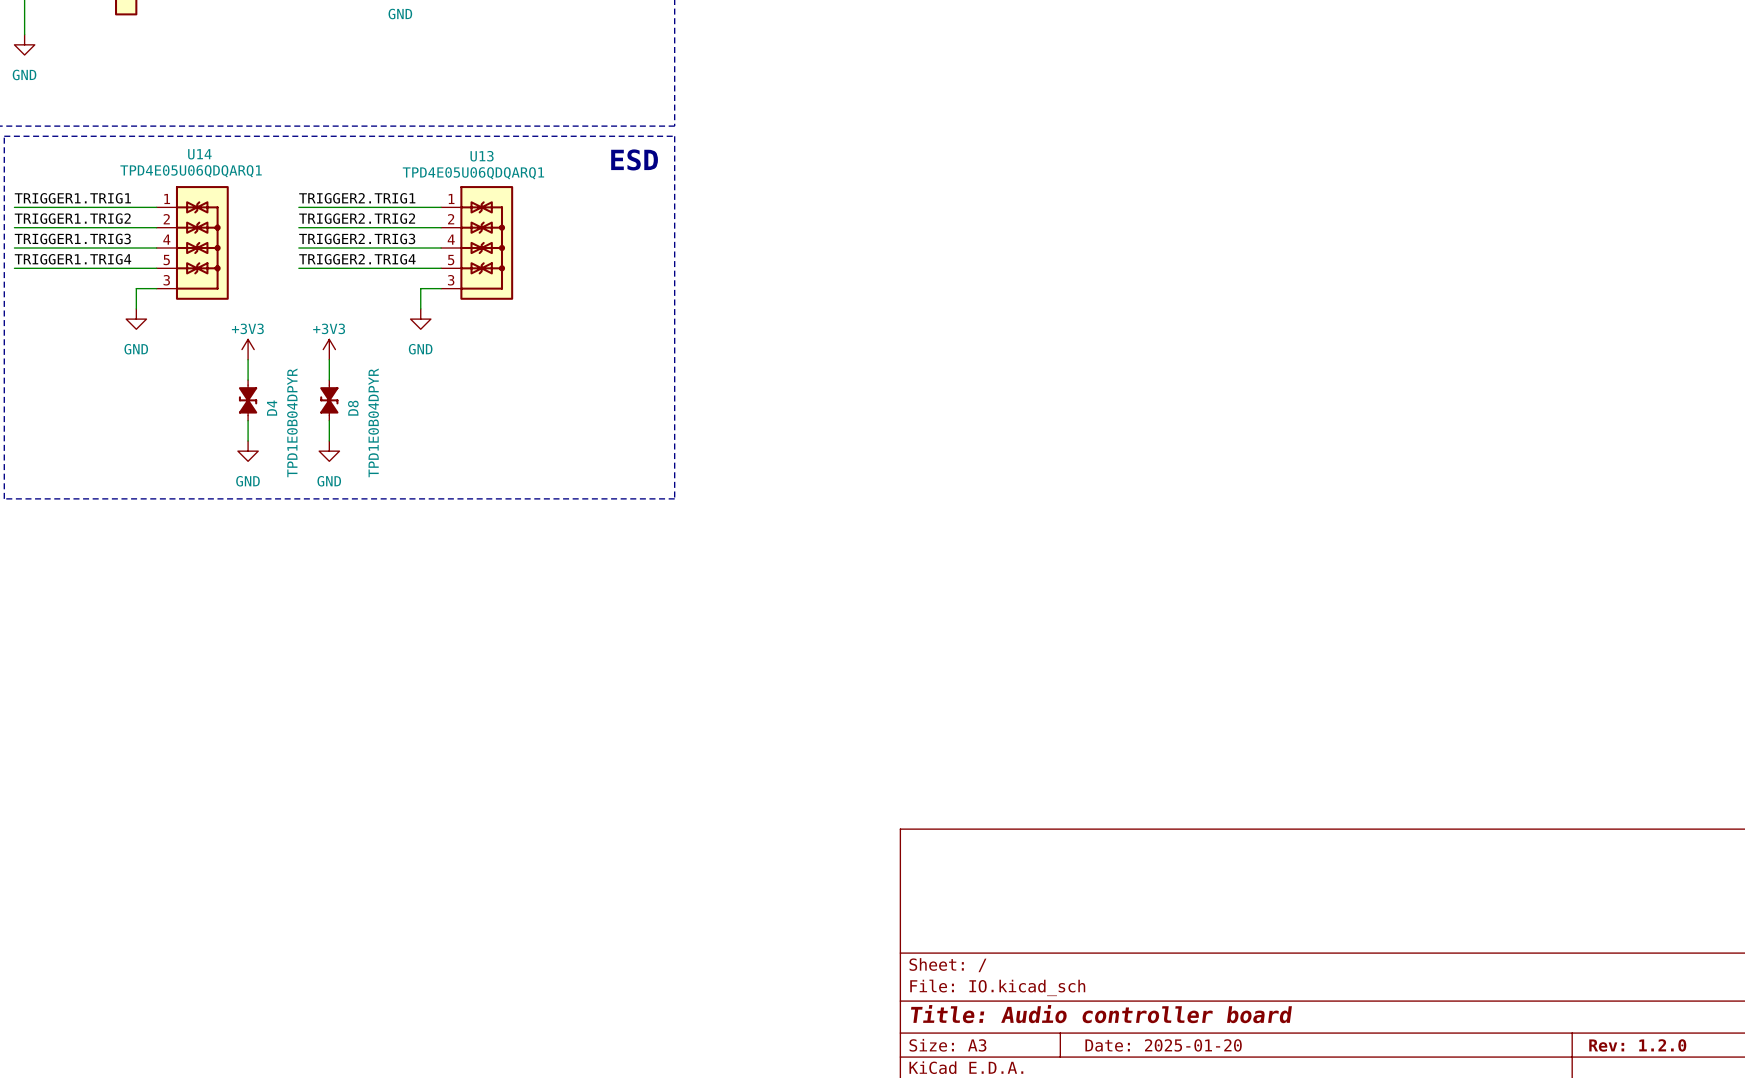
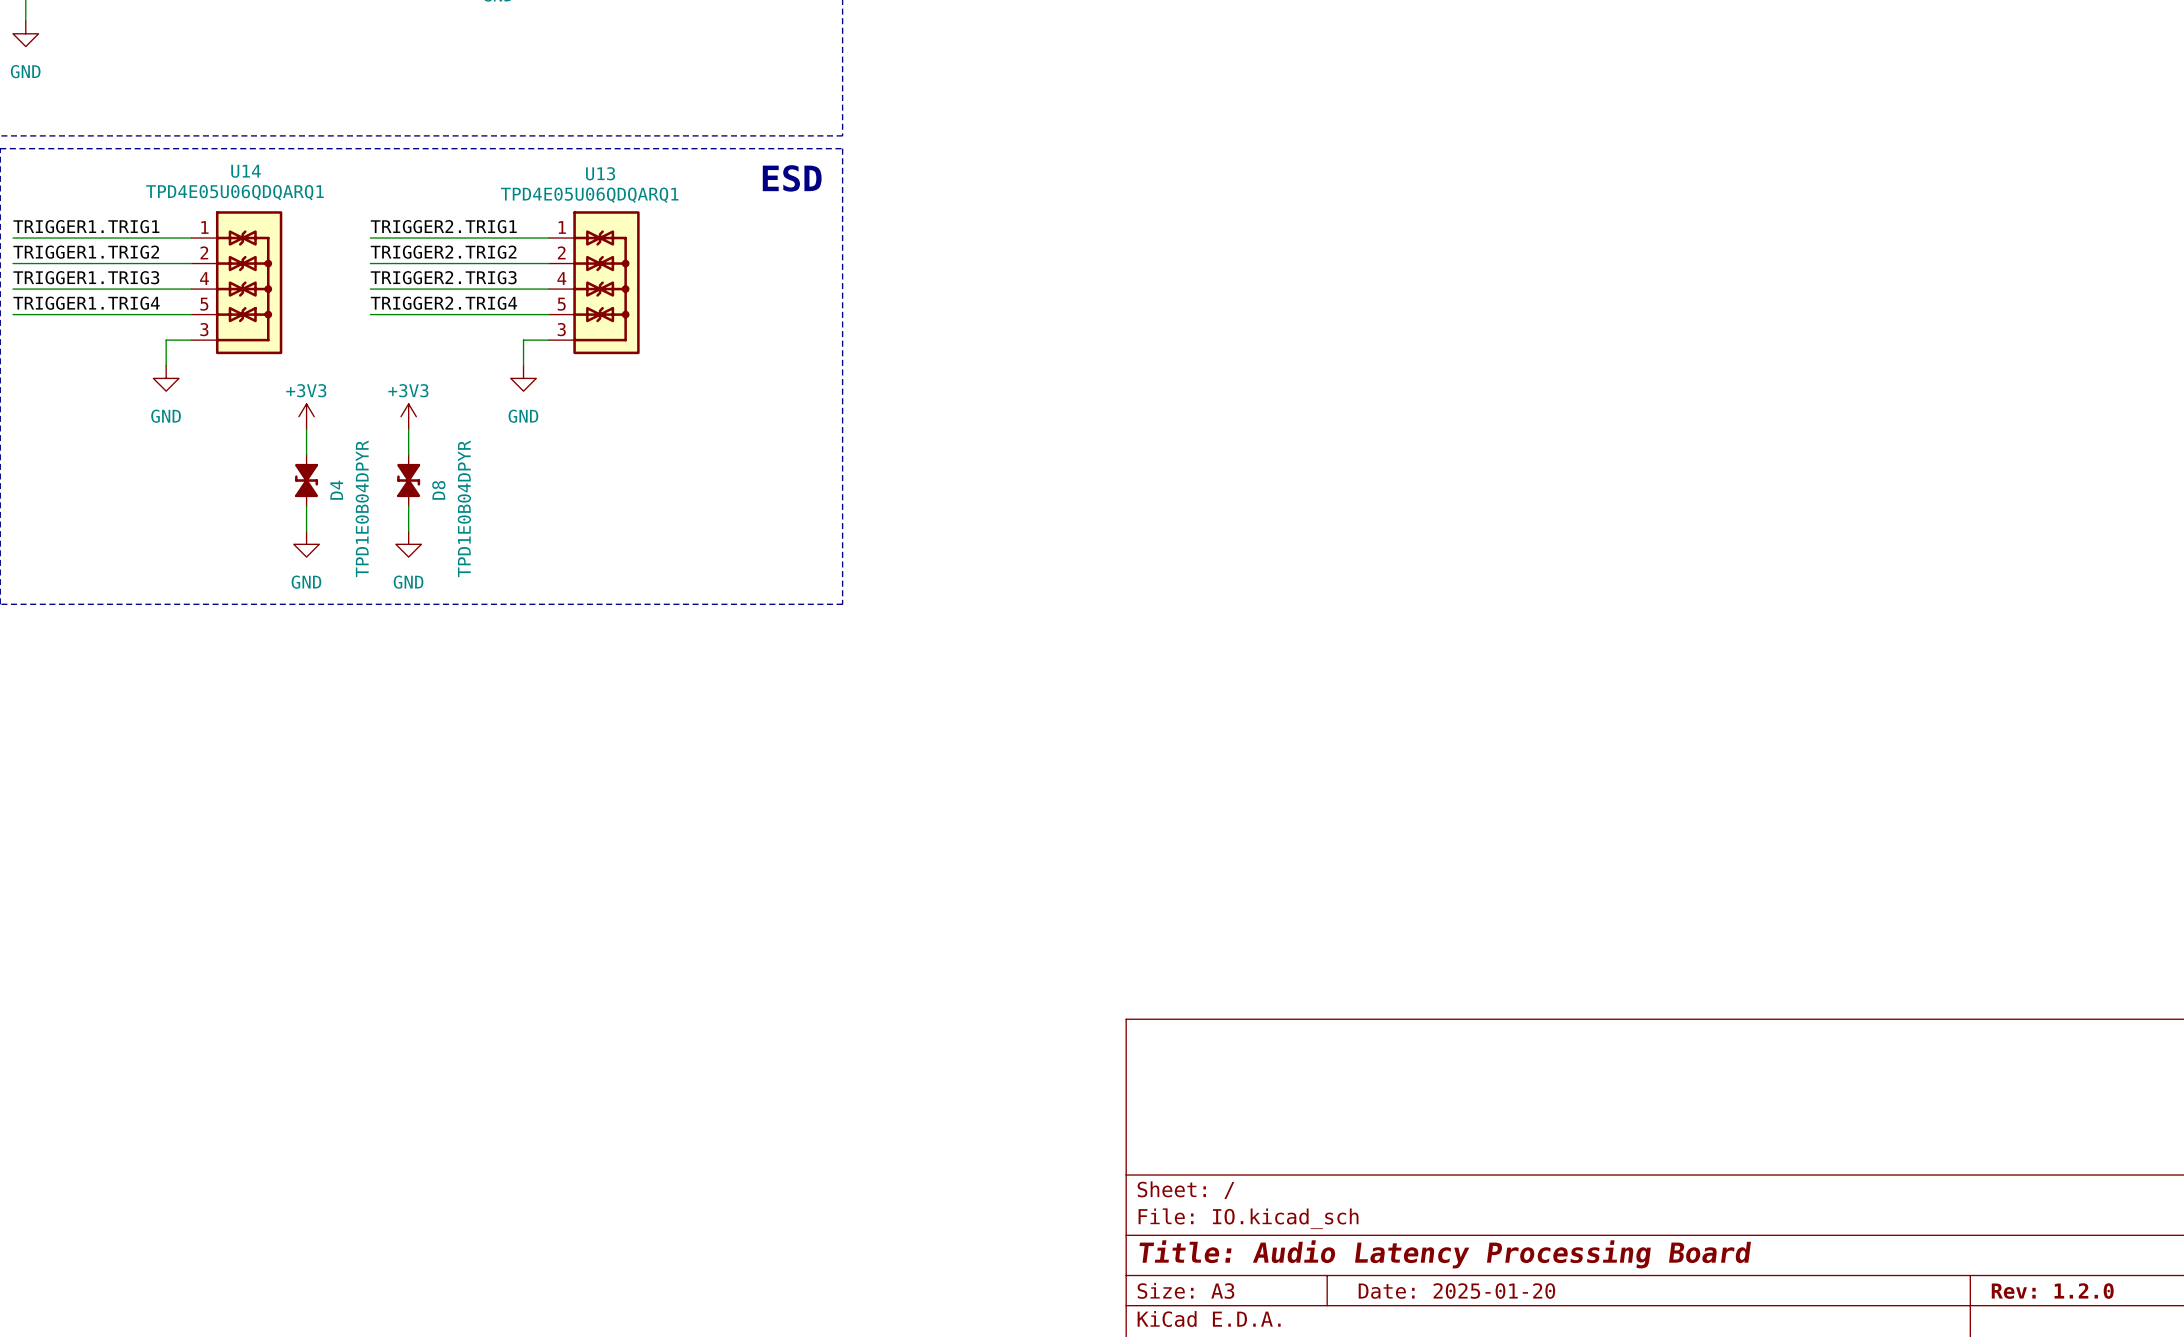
title block: Title: Audio controller board (1101, 1014) -> Title: Audio Latency Processing Board (1445, 1254)

